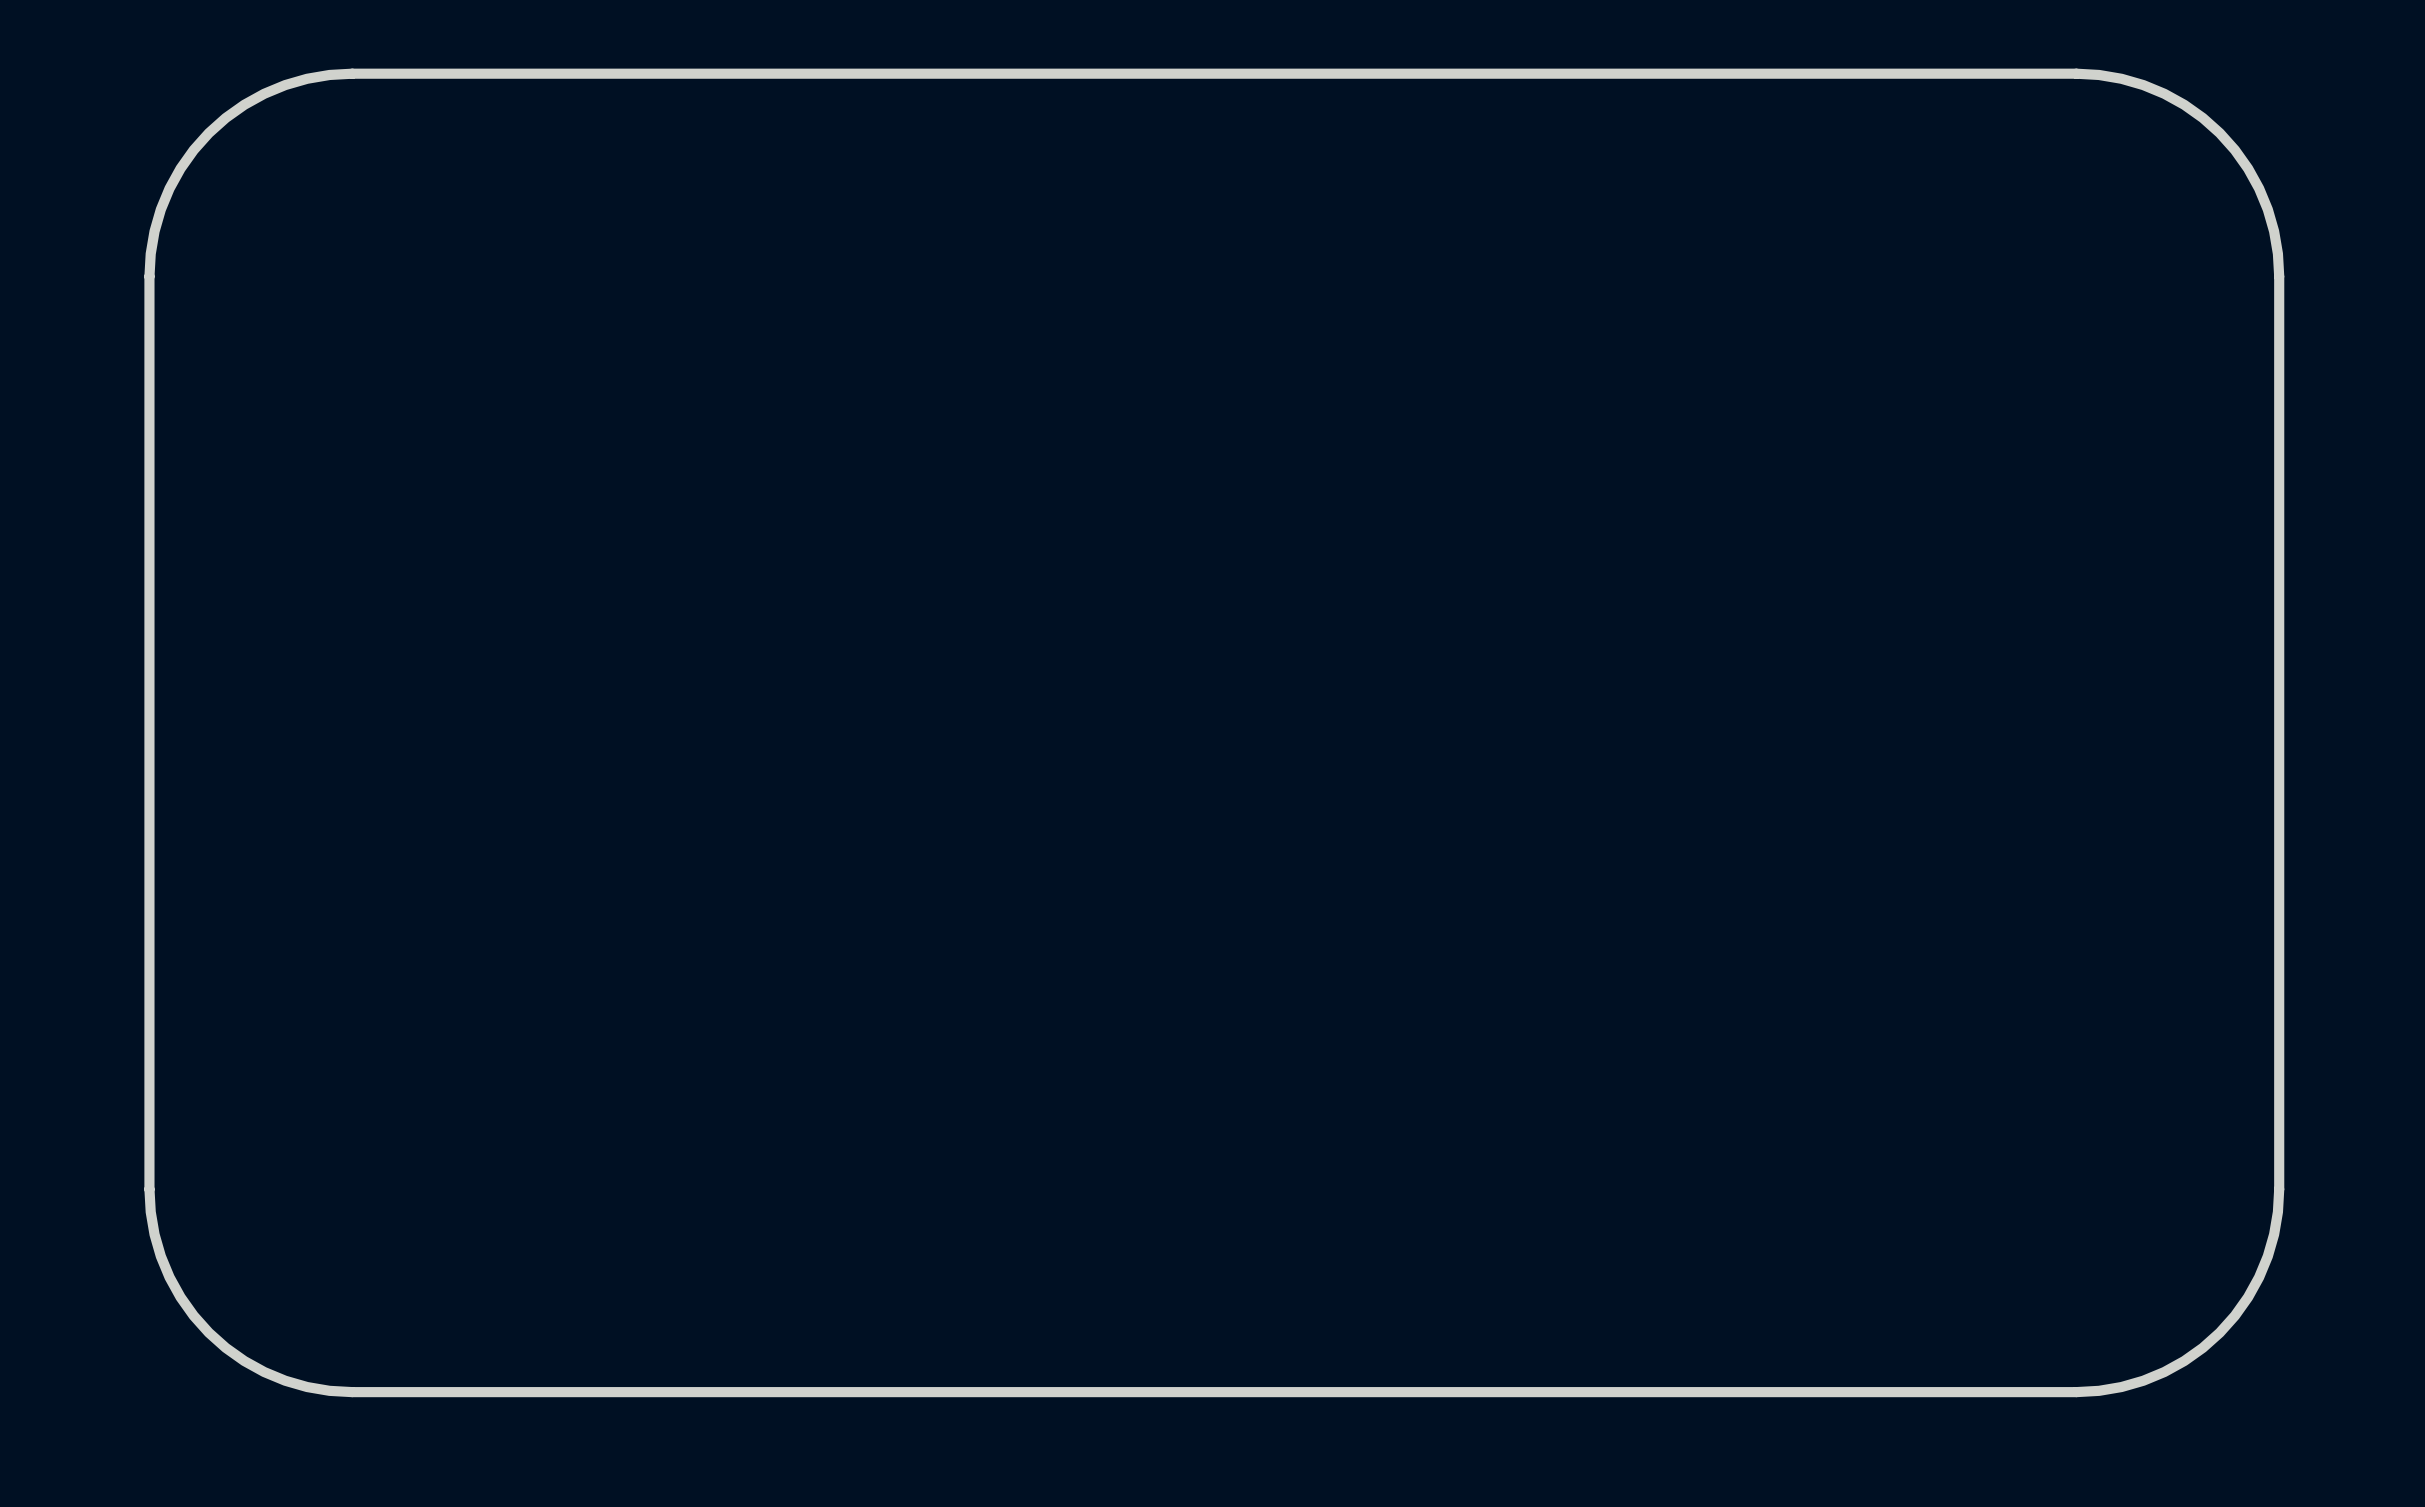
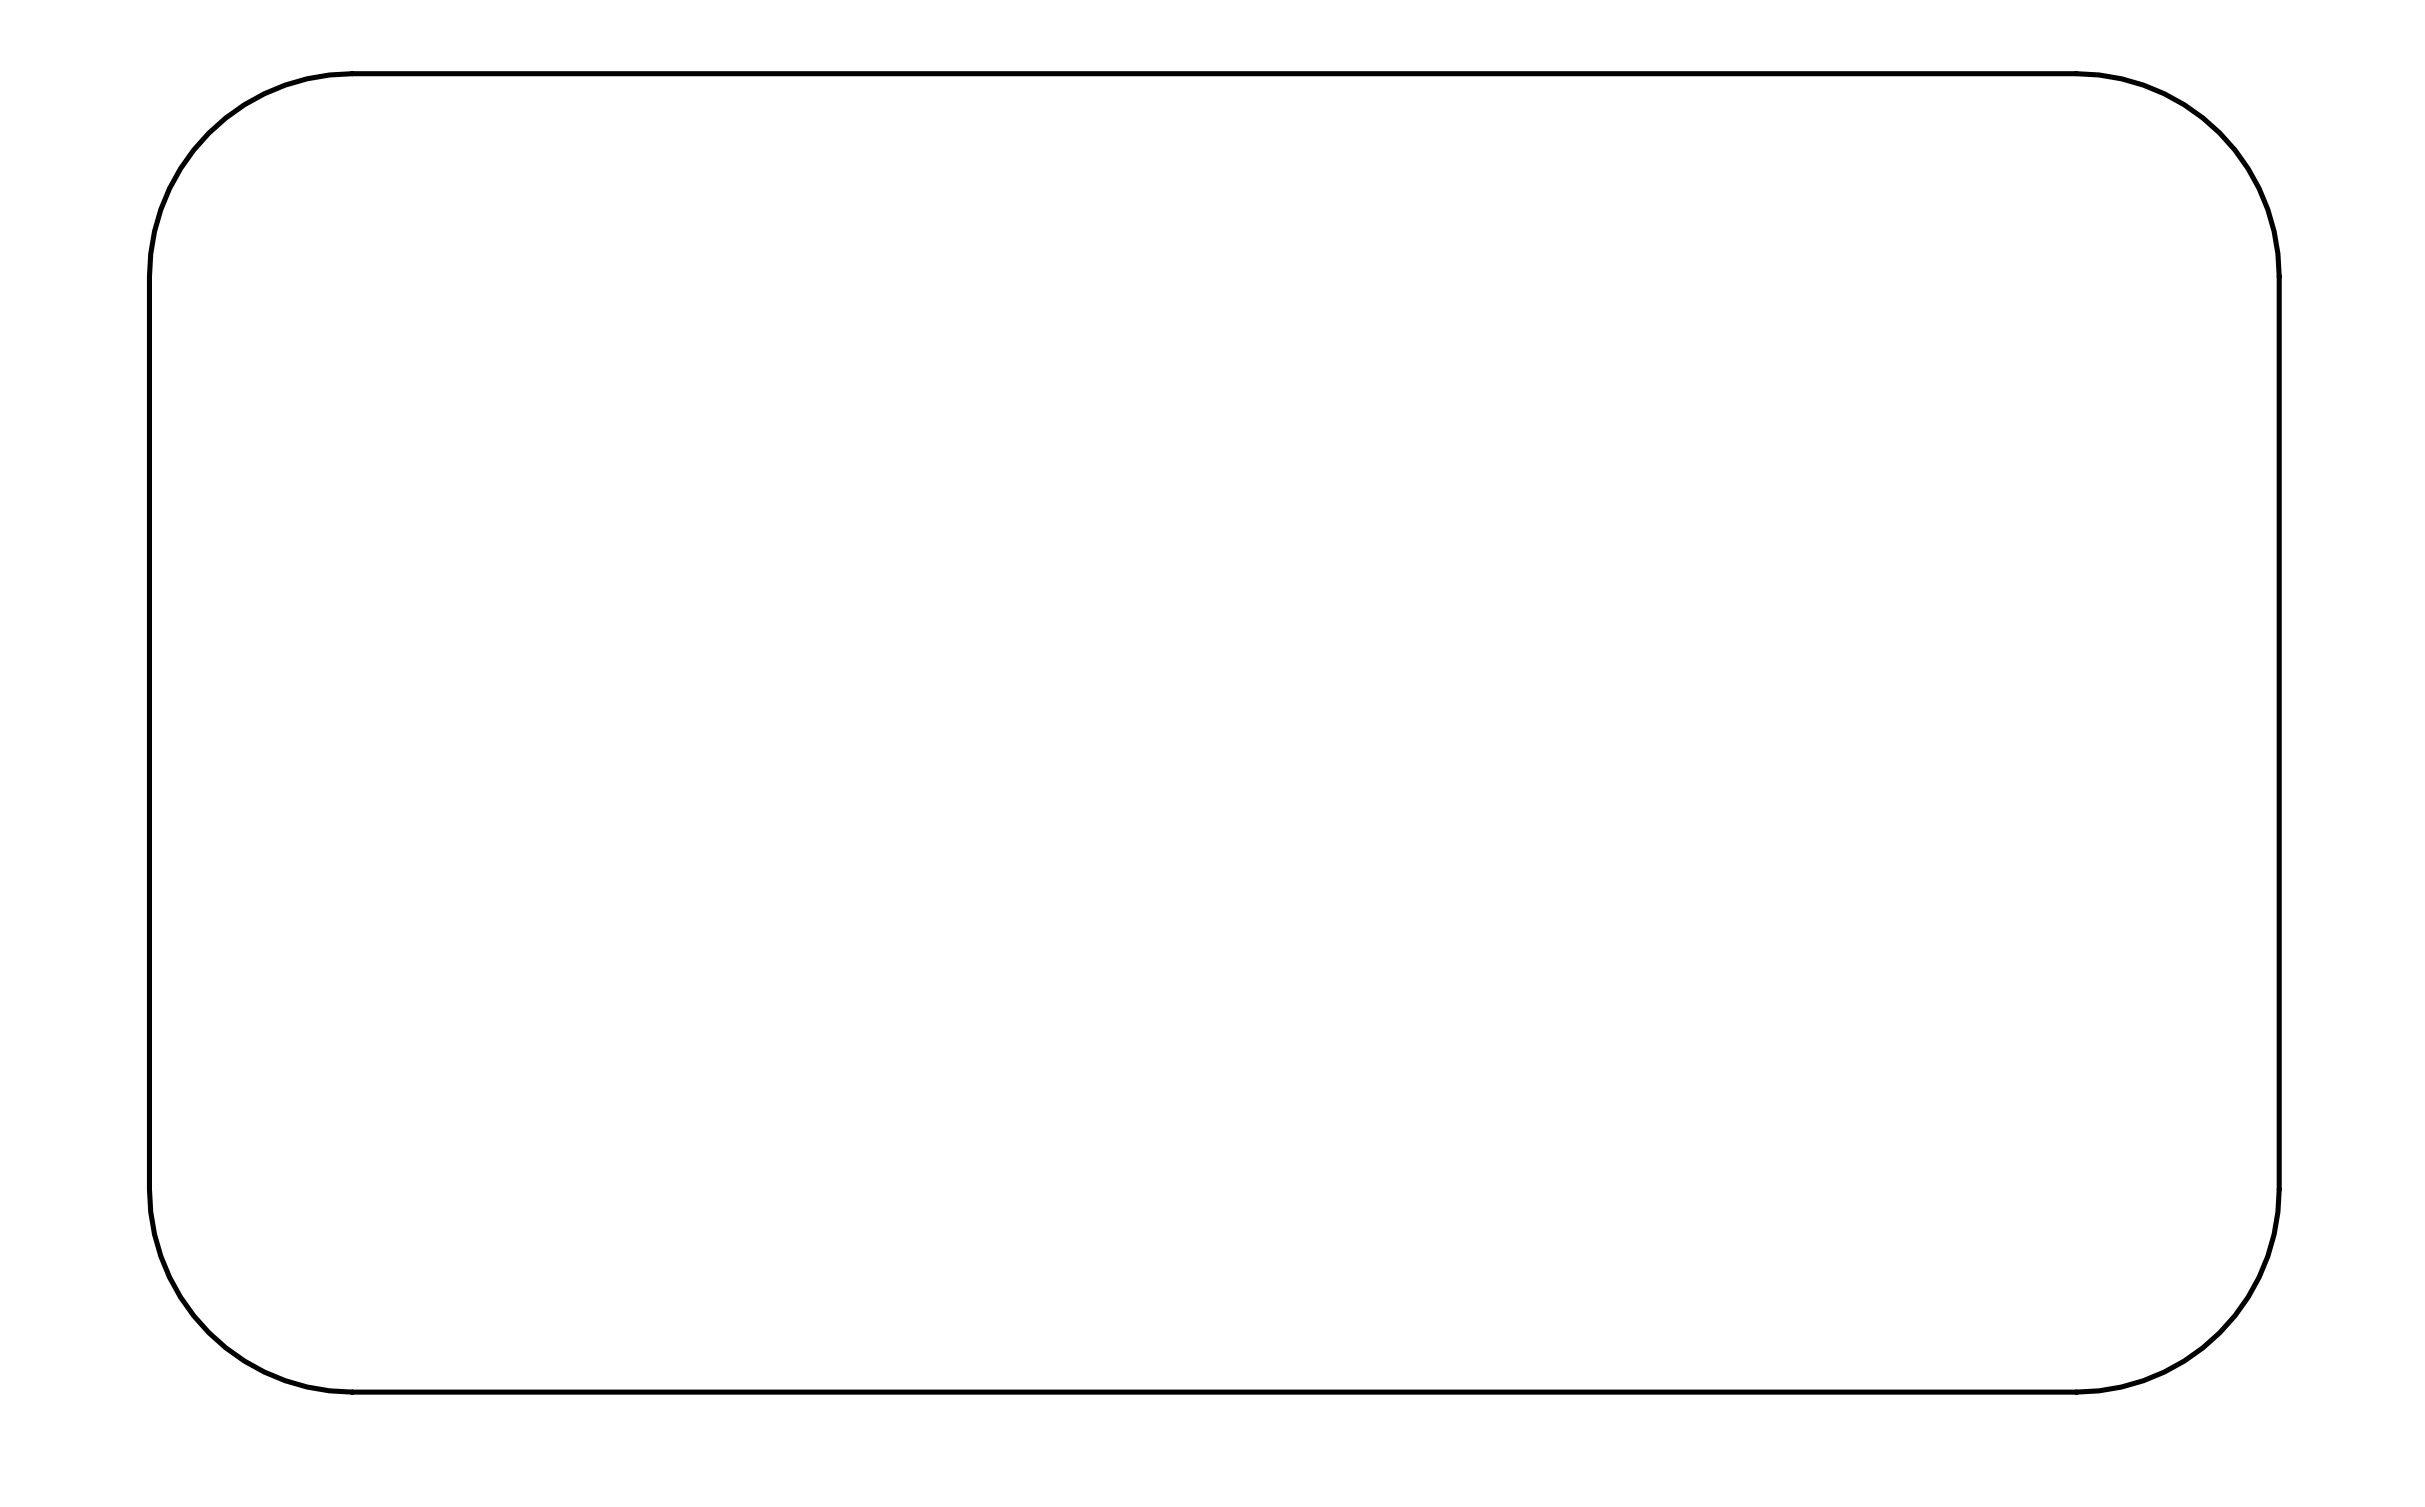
board edge width: thick (2076, 73) (352, 73) (307, 78) (285, 85) (244, 104) (208, 133) (180, 168) (160, 209) (154, 231) (149, 276) (149, 1189) (150, 1211) (160, 1256) (180, 1297) (208, 1332) (225, 1347) (264, 1372) (307, 1387) (352, 1392) (2076, 1392) (2099, 1390) (2143, 1380) (2184, 1361) (2219, 1332) (2248, 1297) (2267, 1256) (2277, 1211) (2277, 253) (2267, 209) (2259, 188) (2248, 168) (2219, 133) (2184, 104) (2164, 93) (2121, 78) (2076, 73) -> thin (2076, 73) (352, 73) (307, 78) (285, 85) (244, 104) (208, 133) (180, 168) (160, 209) (154, 231) (149, 276) (149, 1189) (150, 1211) (160, 1256) (180, 1297) (208, 1332) (225, 1347) (264, 1372) (307, 1387) (352, 1392) (2076, 1392) (2099, 1390) (2143, 1380) (2184, 1361) (2219, 1332) (2248, 1297) (2267, 1256) (2277, 1211) (2277, 253) (2267, 209) (2259, 188) (2248, 168) (2219, 133) (2184, 104) (2164, 93) (2121, 78) (2076, 73)

